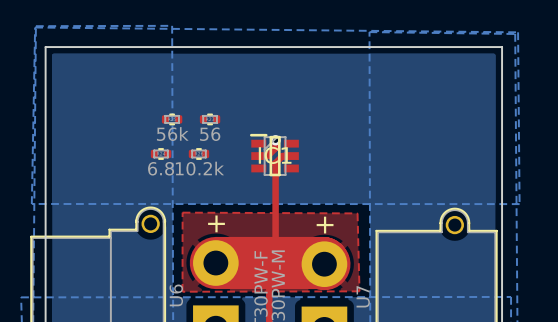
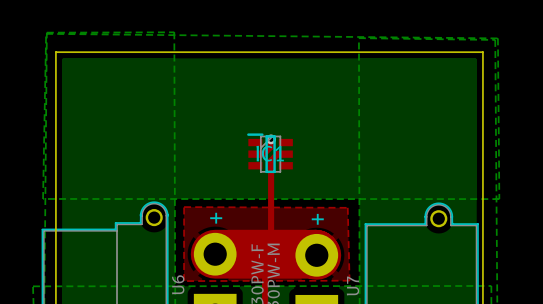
part: 56k (172, 119) -> none
part: 56 (210, 119) -> none
part: 6.8 (161, 153) -> none
part: 10.2k (198, 153) -> none

